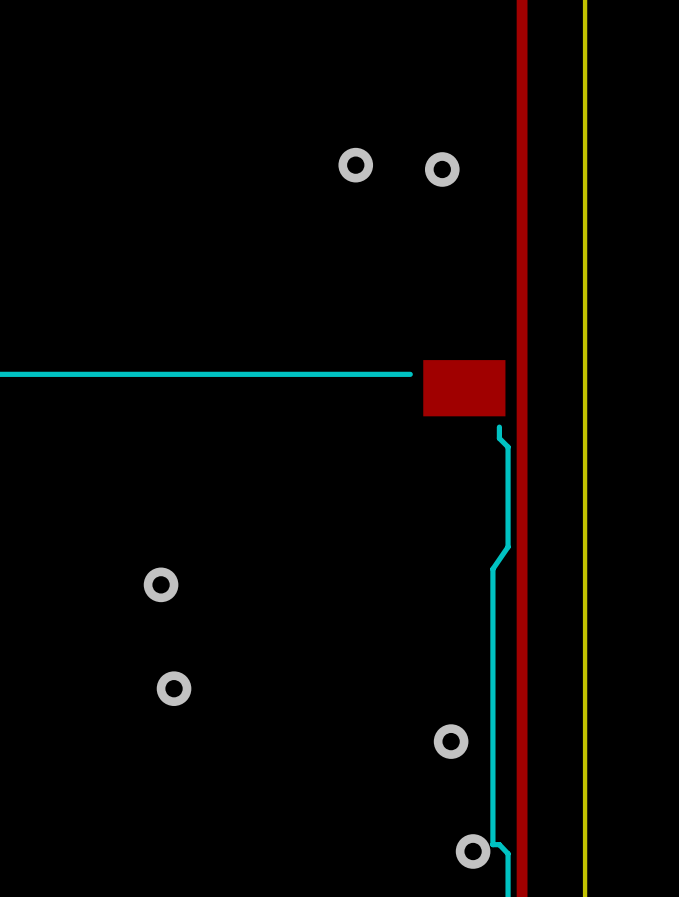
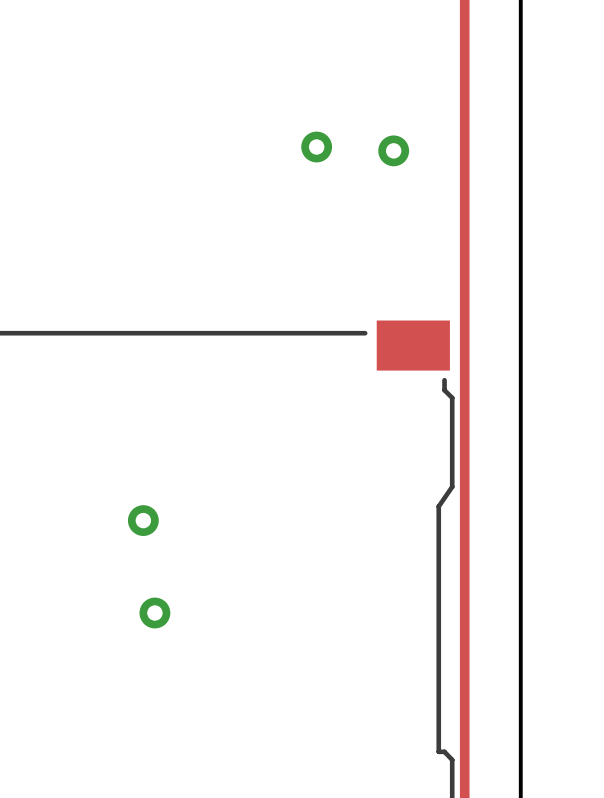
via: (451, 741) -> none
via: (473, 851) -> none

